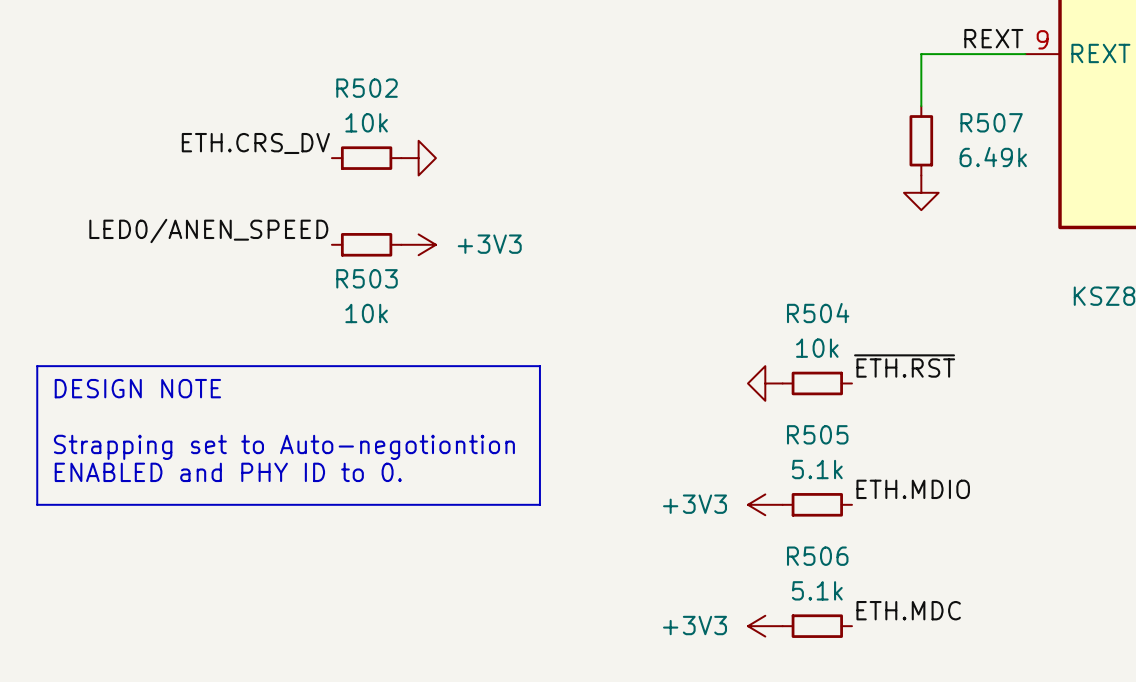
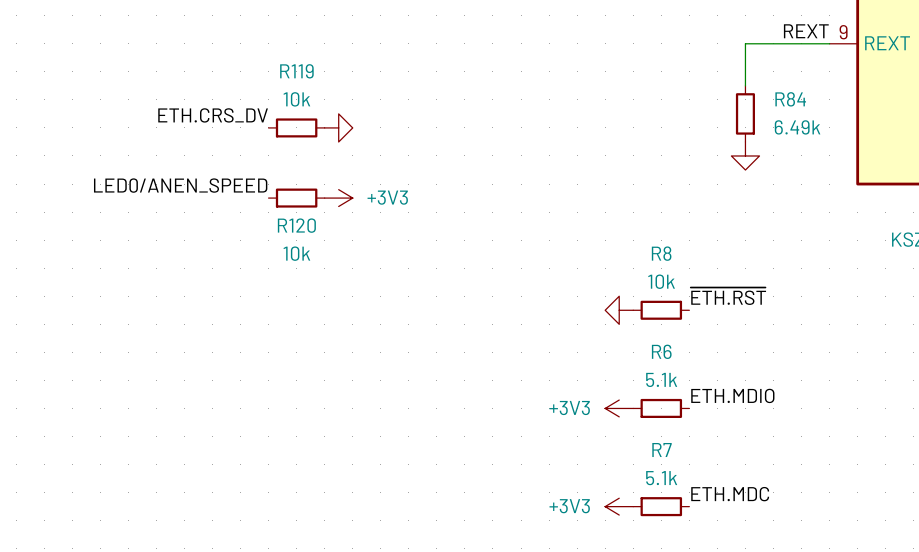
R502 name: R502 (367, 88) -> R119 (296, 71)
R507 name: R507 (991, 122) -> R84 (790, 99)
R503 name: R503 (367, 278) -> R120 (296, 225)
R504 name: R504 (818, 313) -> R8 (661, 253)
line: (37, 366) (539, 366) (539, 504) (37, 504) (37, 366) -> none
text: DESIGN NOTE (137, 388) -> none
R505 name: R505 (817, 434) -> R6 (661, 351)
text: Strapping set to Auto-negotiontion (284, 447) -> none
text: ENABLED and PHY ID to 0. (228, 472) -> none
R506 name: R506 (817, 556) -> R7 (662, 450)

